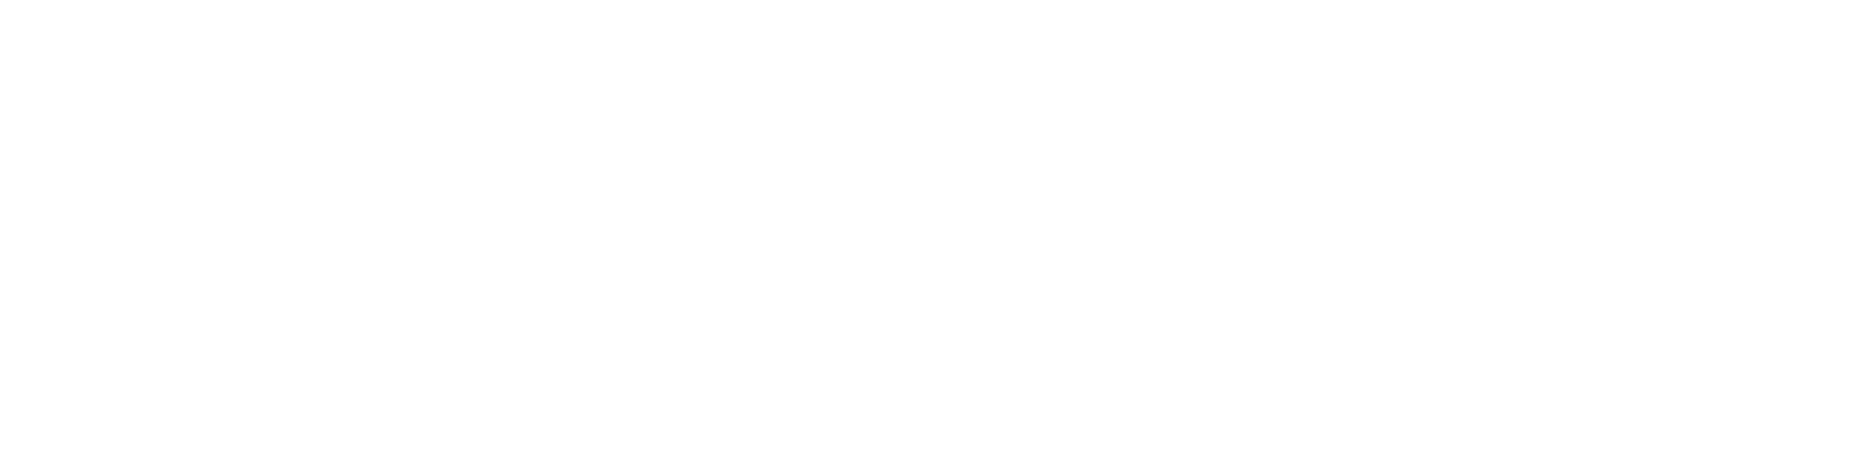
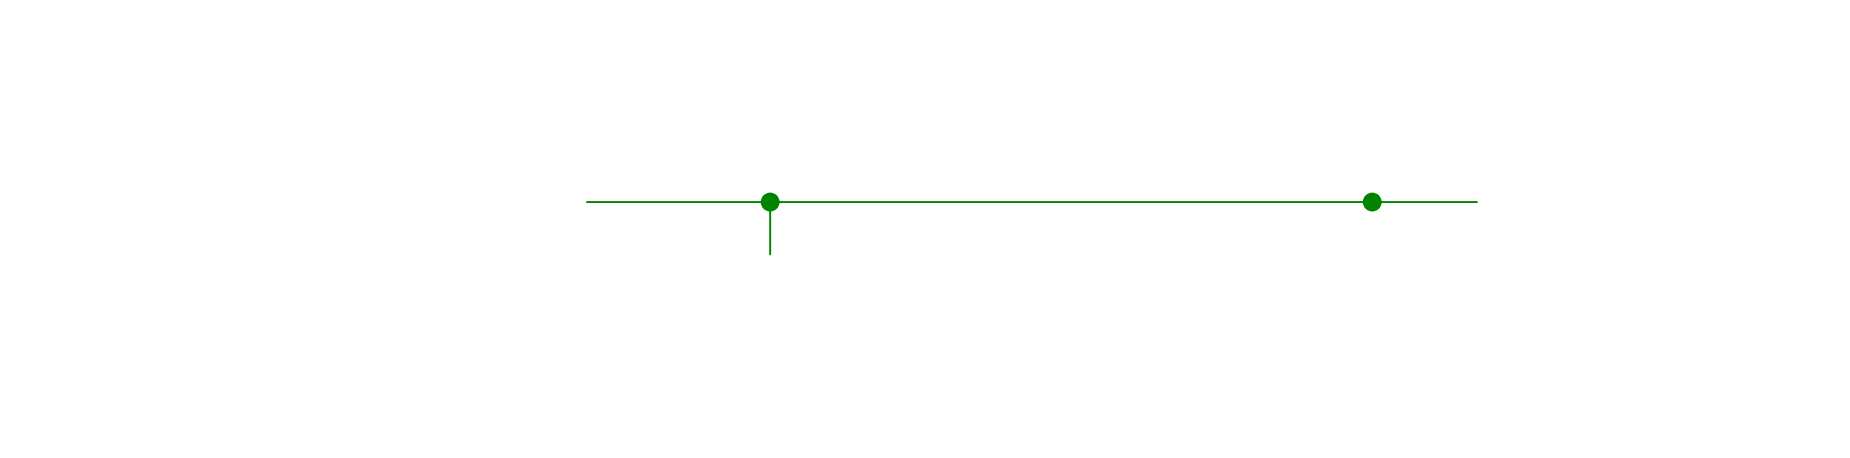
wire: none -> (586, 202) (1476, 202)
wire: none -> (770, 202) (770, 254)
junction: none -> (770, 202)
junction: none -> (1372, 202)

